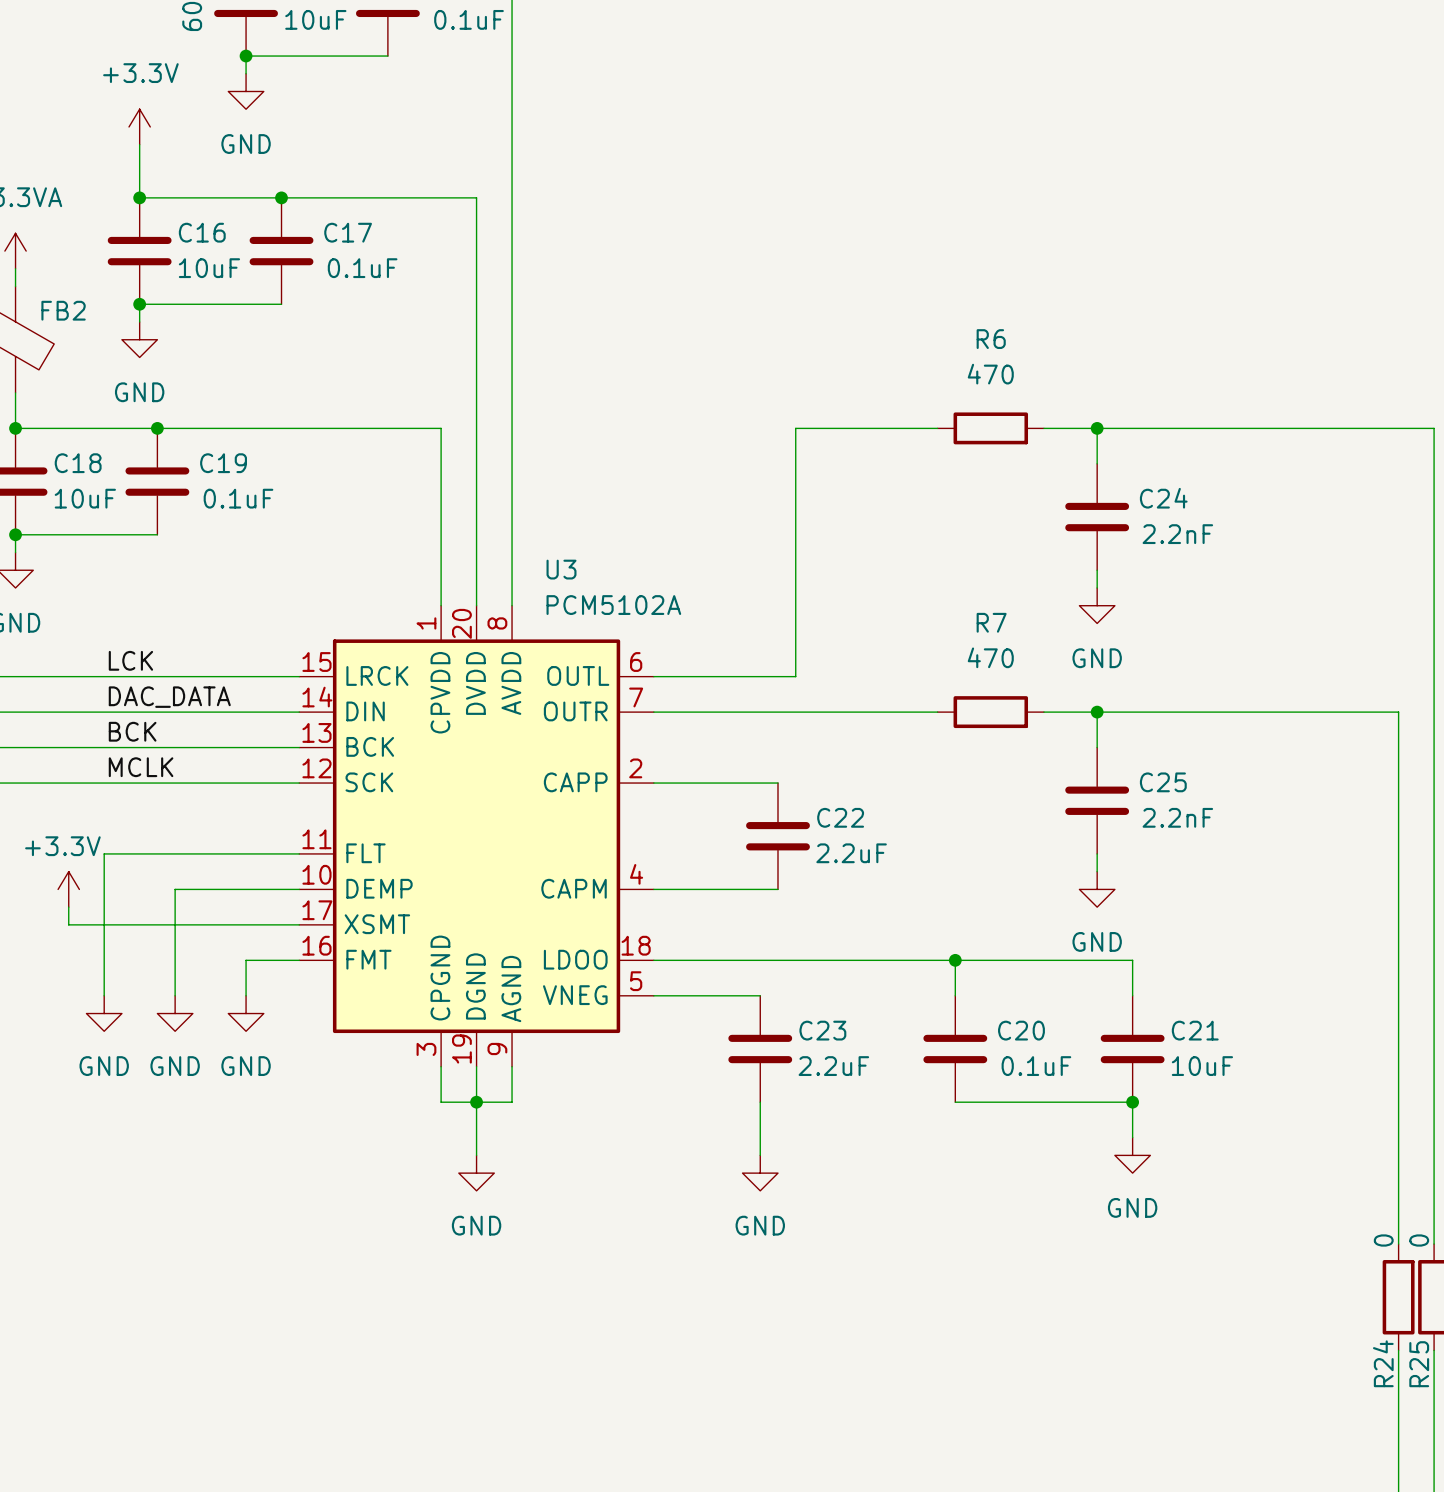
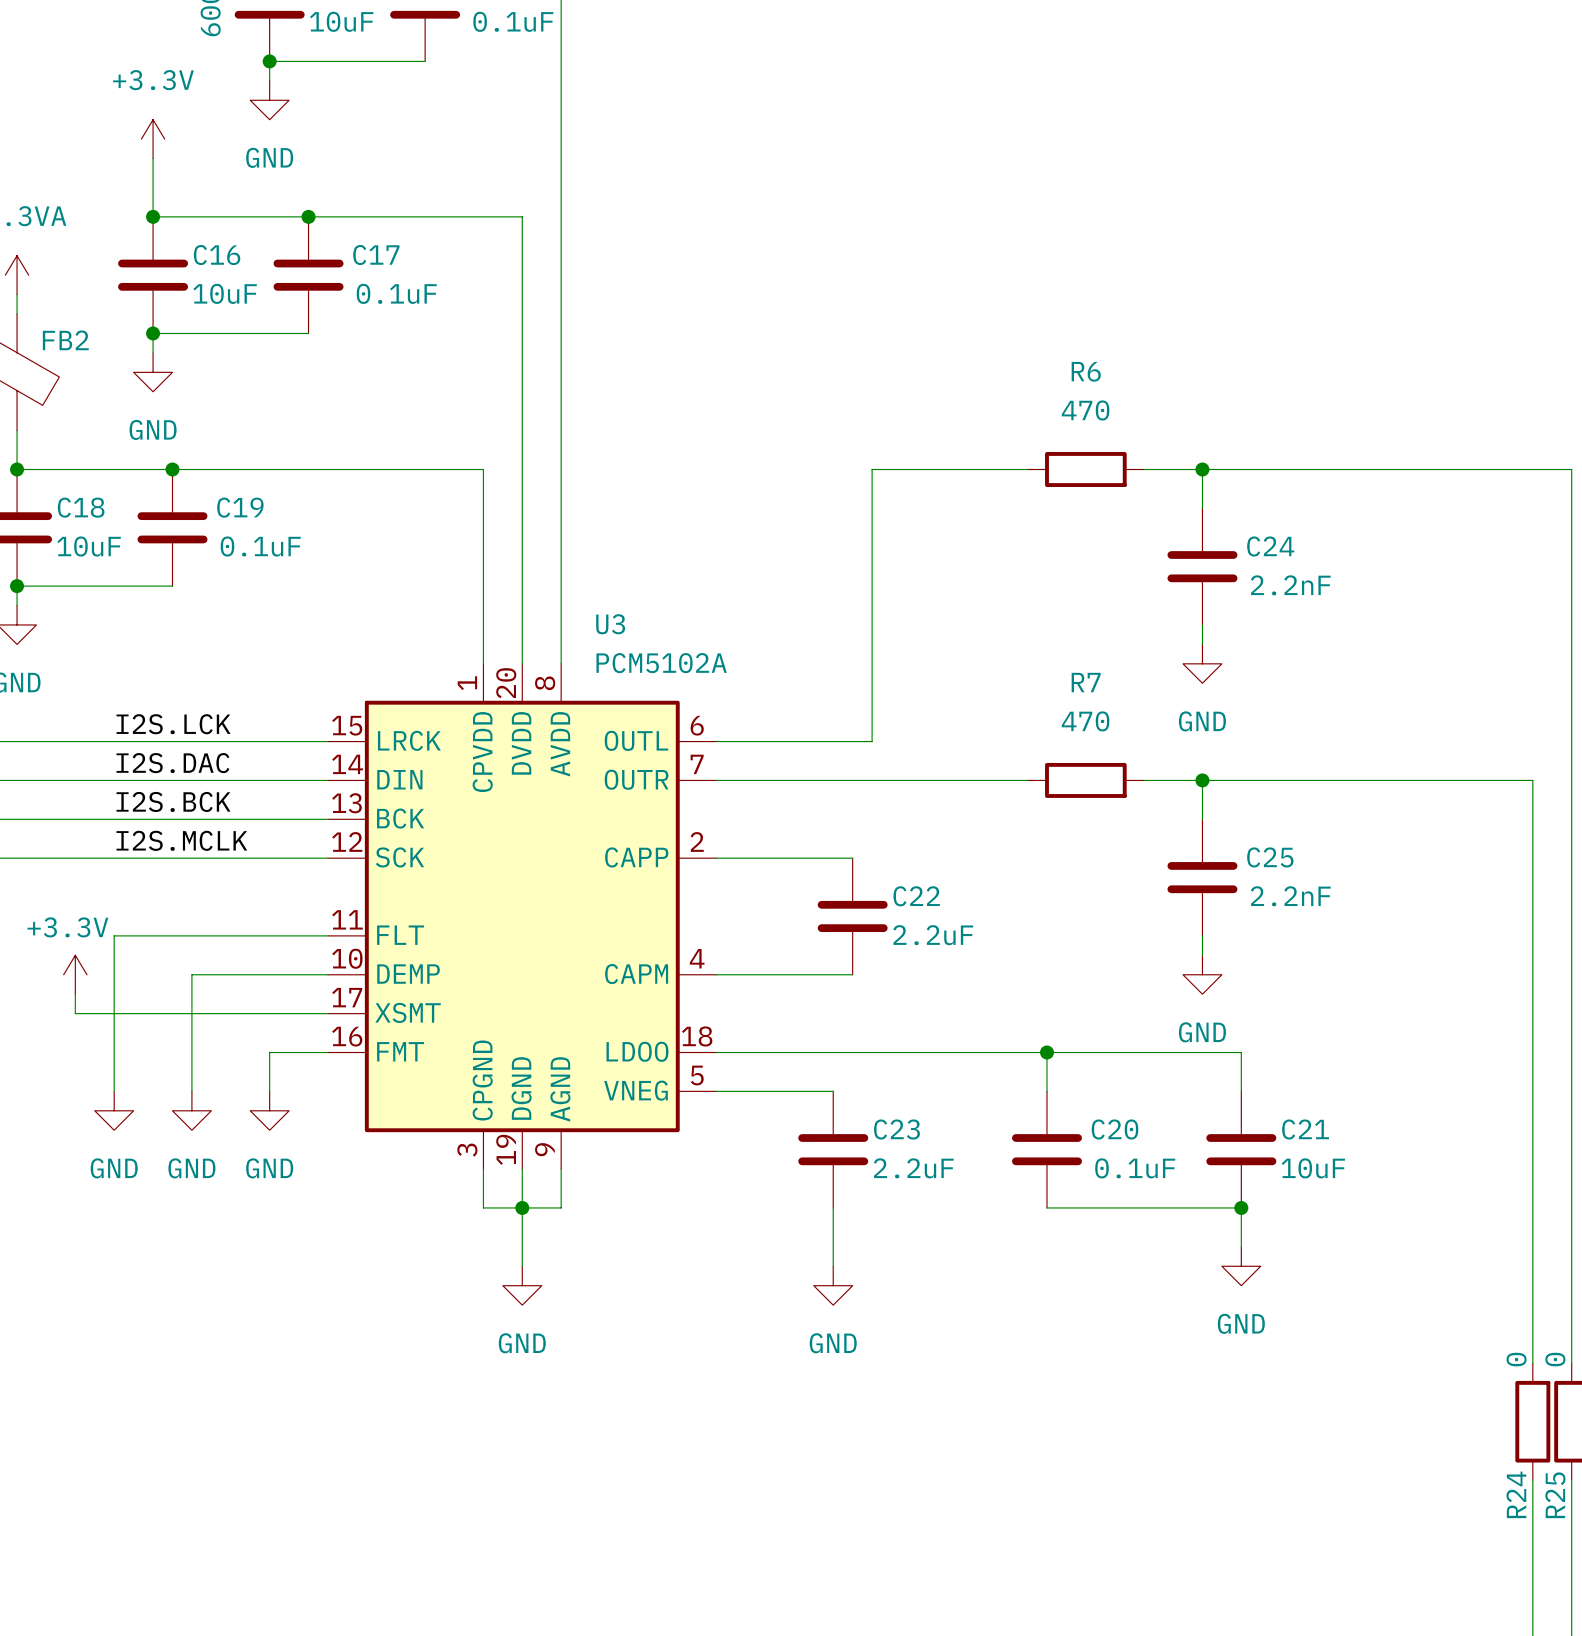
label: LCK (130, 660) -> I2S.LCK (173, 724)
label: DAC_DATA (169, 697) -> I2S.DAC (172, 763)
label: BCK (132, 731) -> I2S.BCK (173, 801)
label: MCLK (141, 767) -> I2S.MCLK (181, 840)

